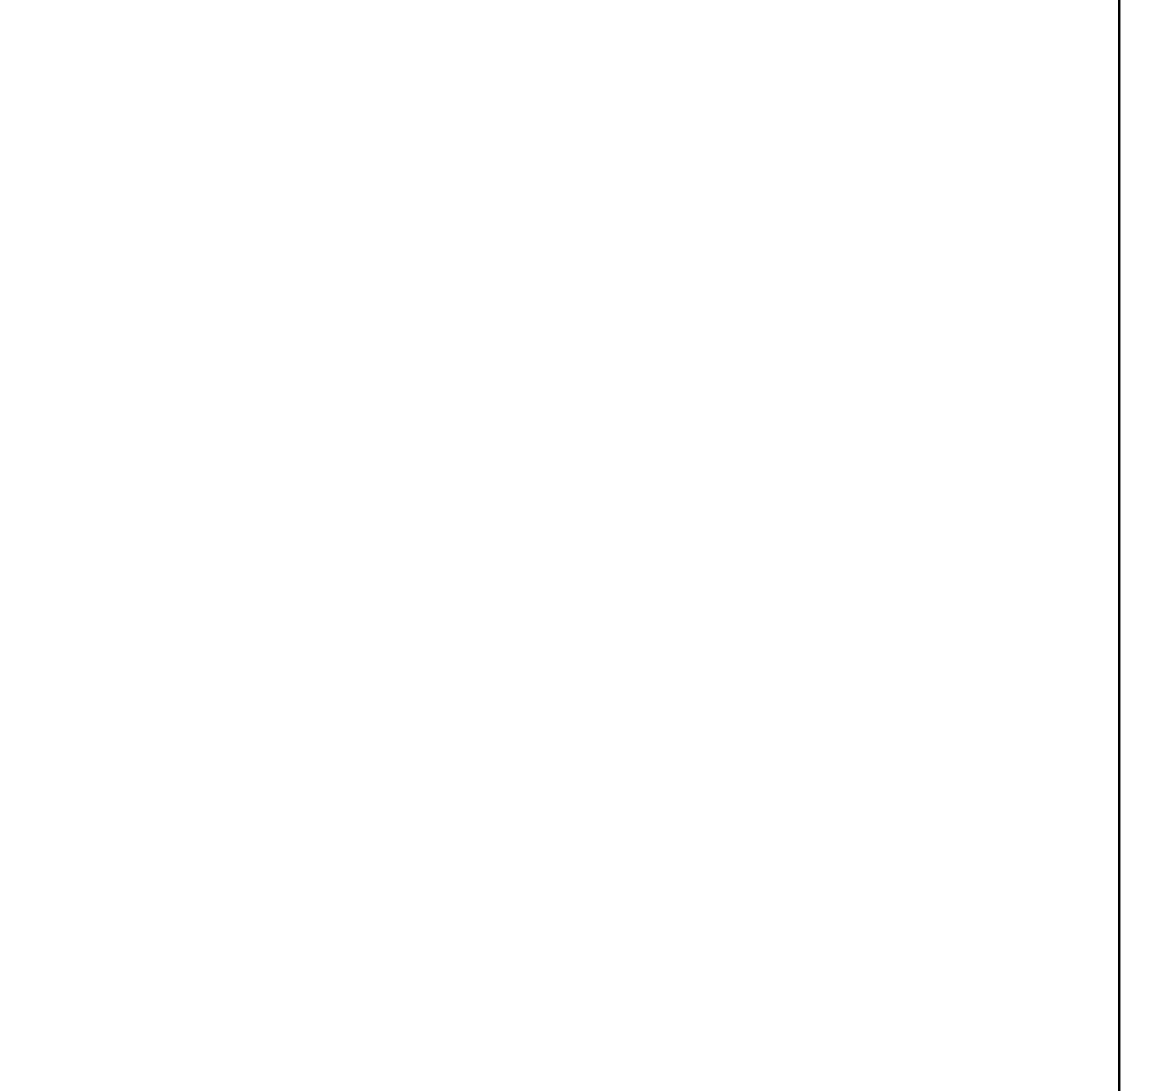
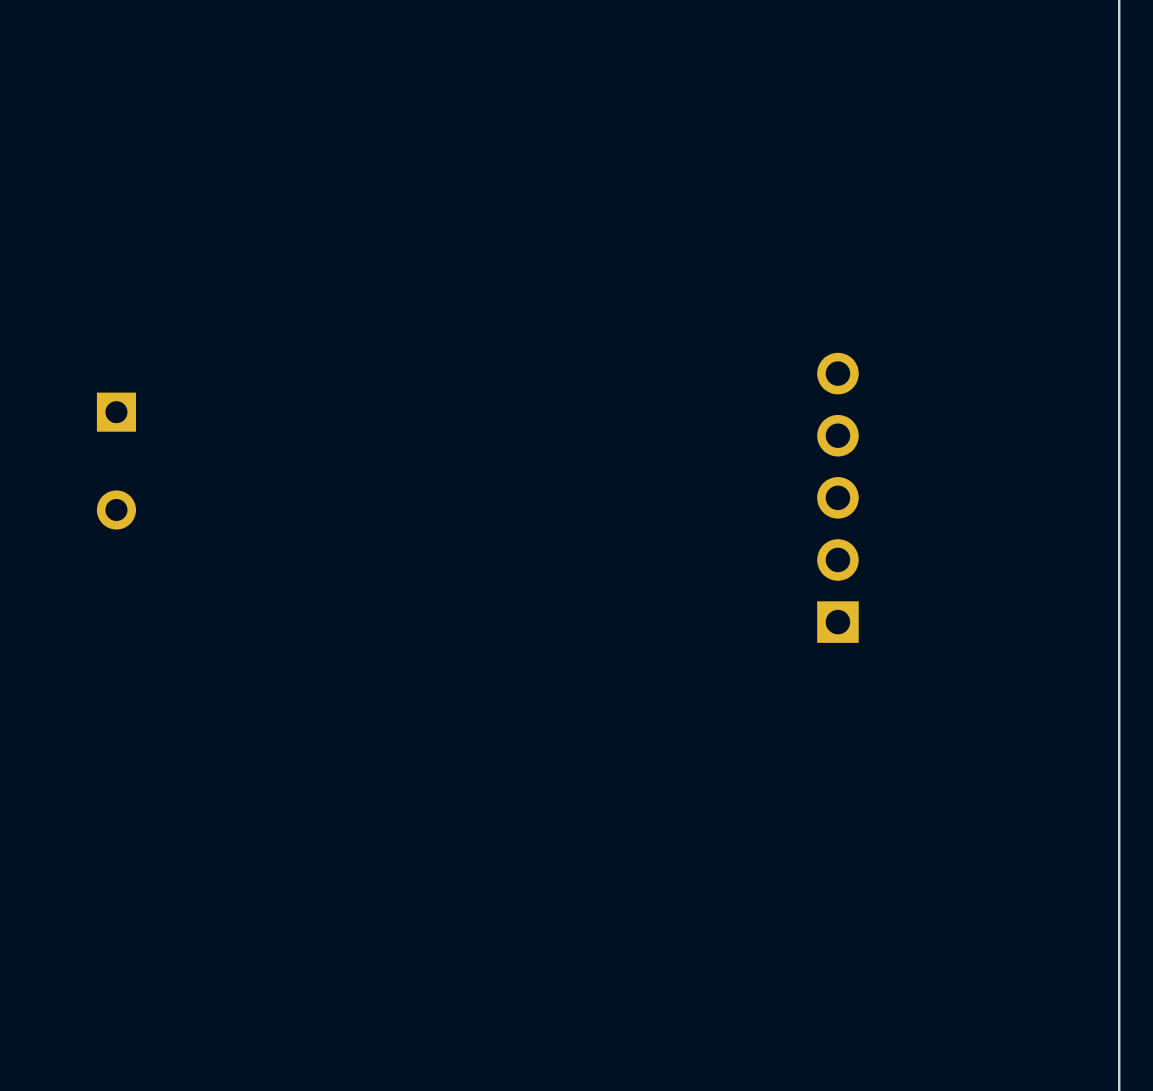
part: none -> (116, 461)
part: none -> (837, 497)

